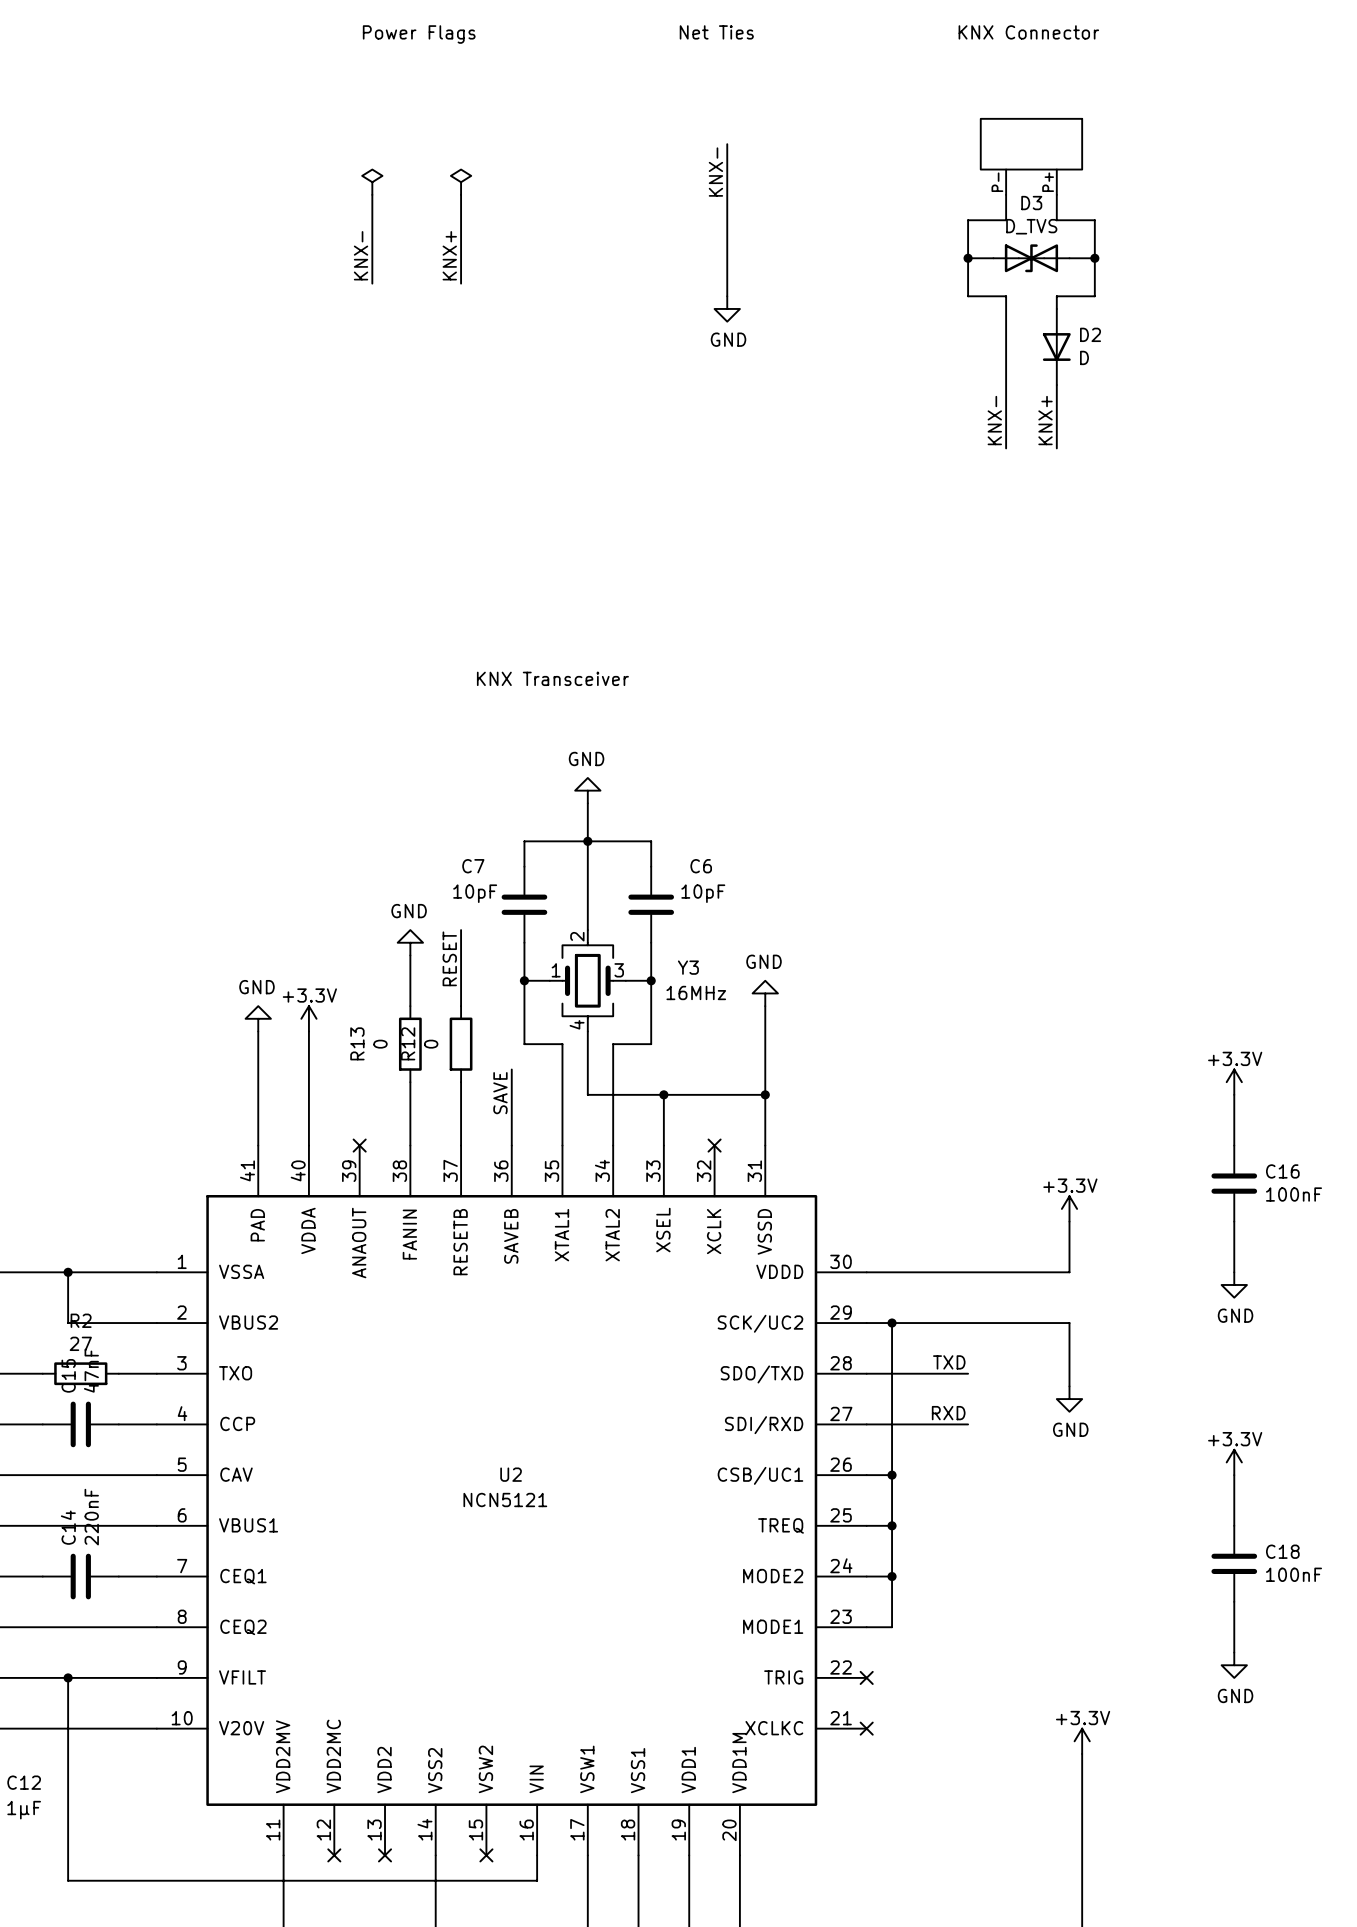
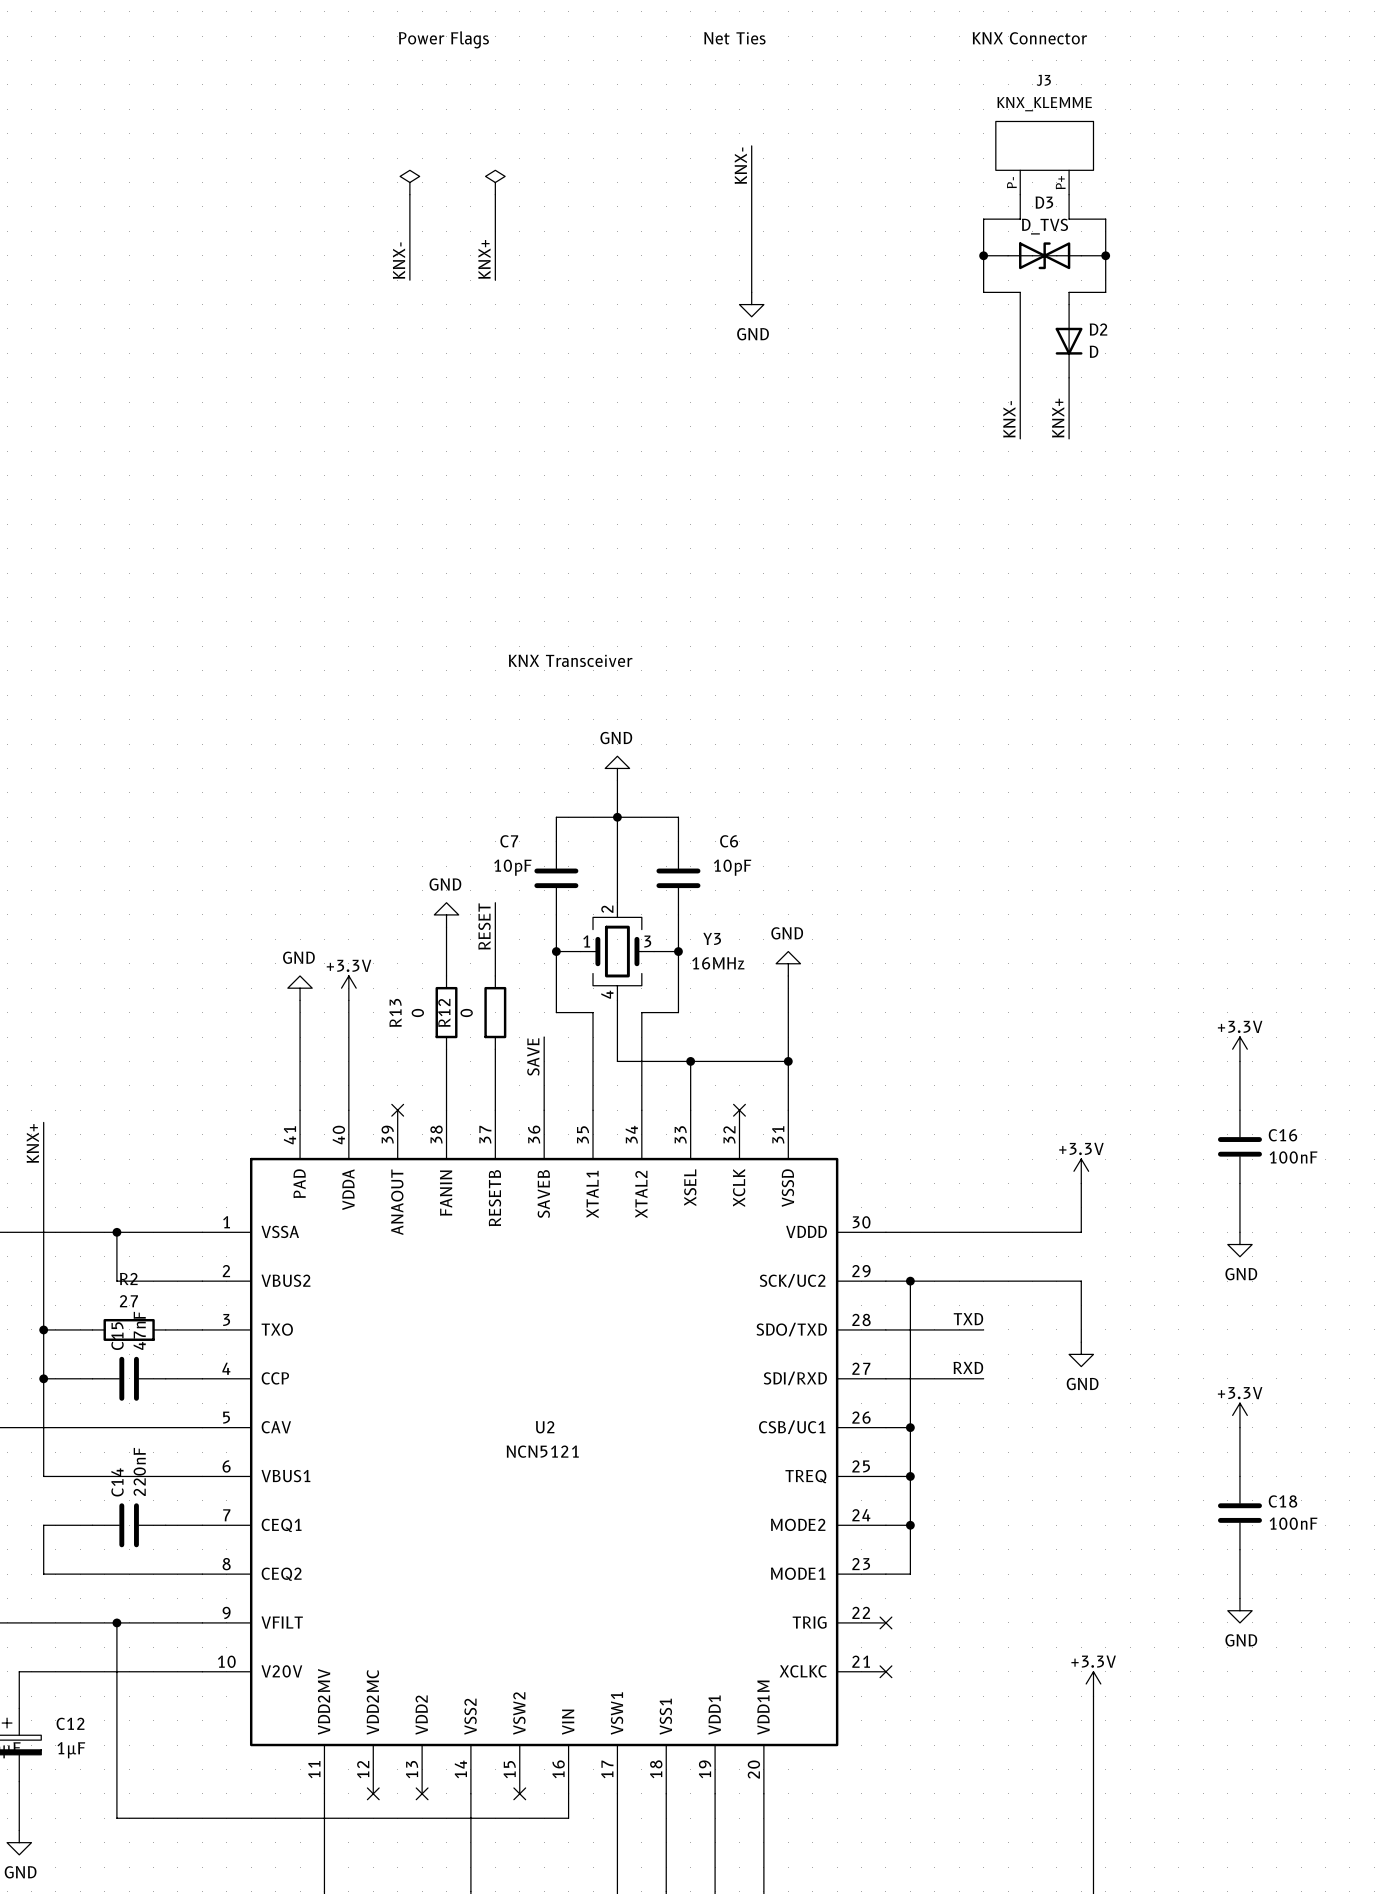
J3 name: none -> J3 (1043, 80)
J3 value: none -> KNX_KLEMME (1044, 104)

